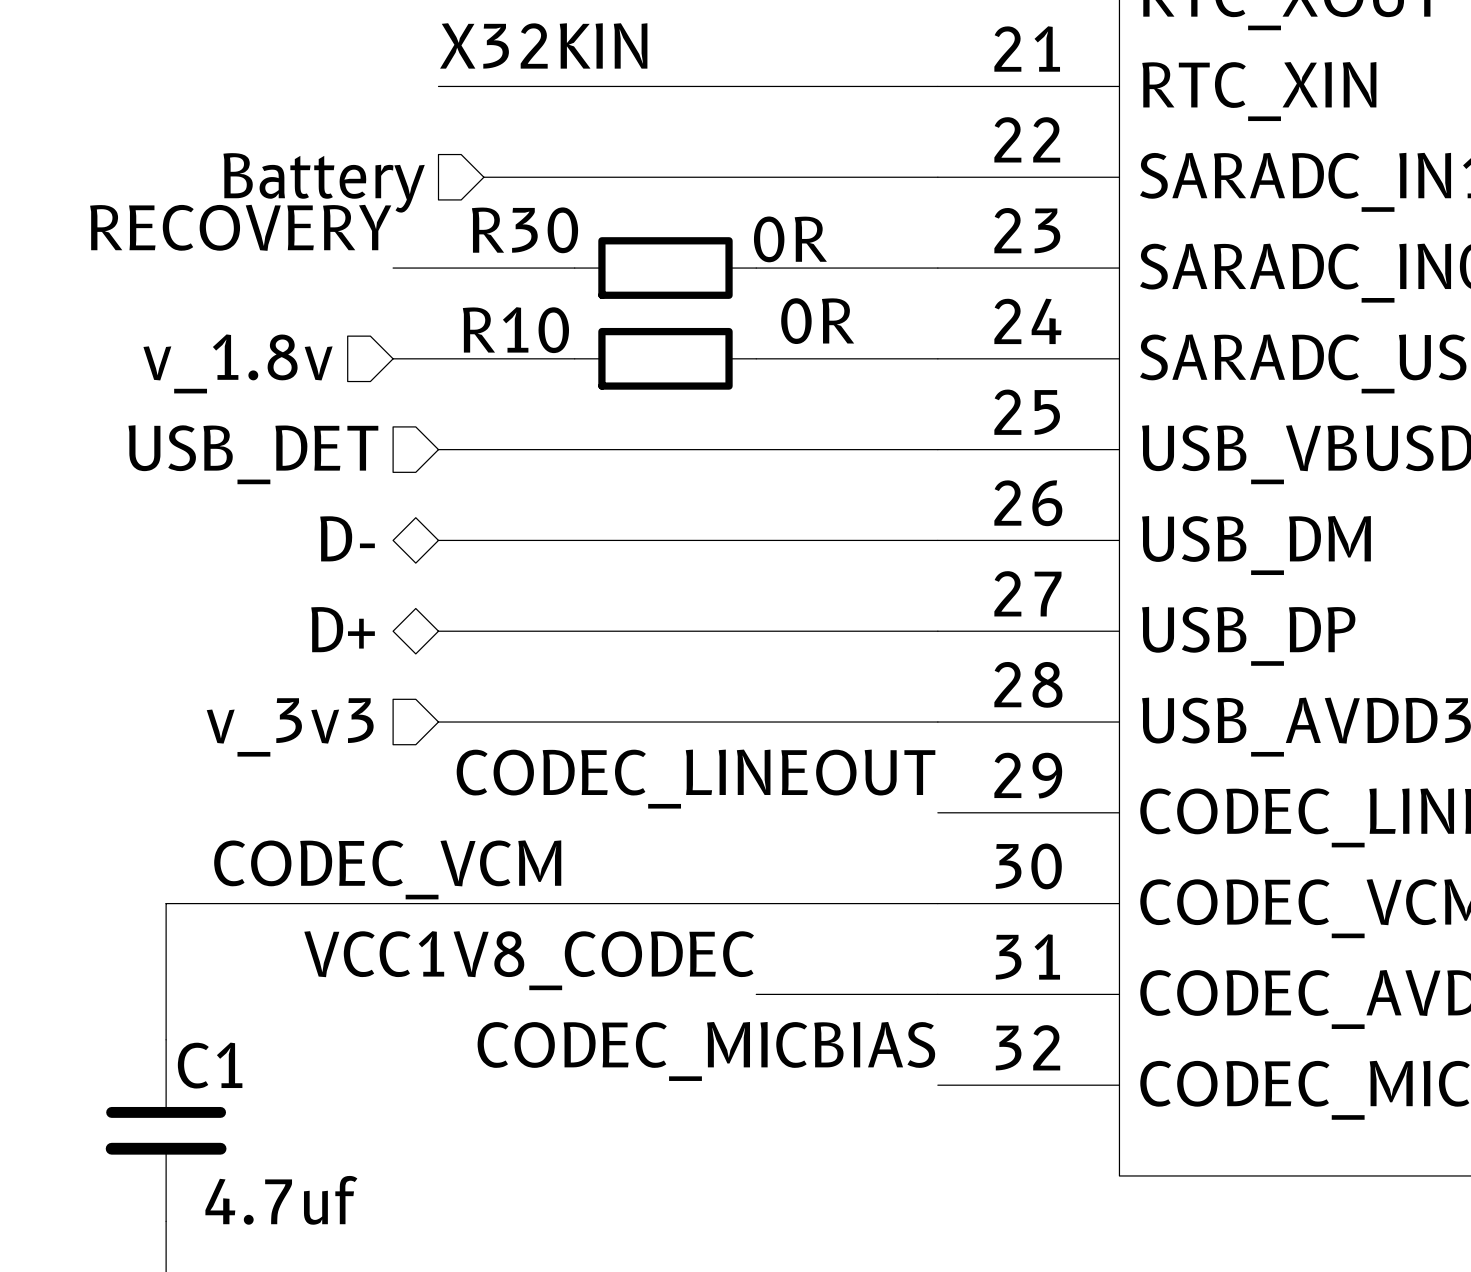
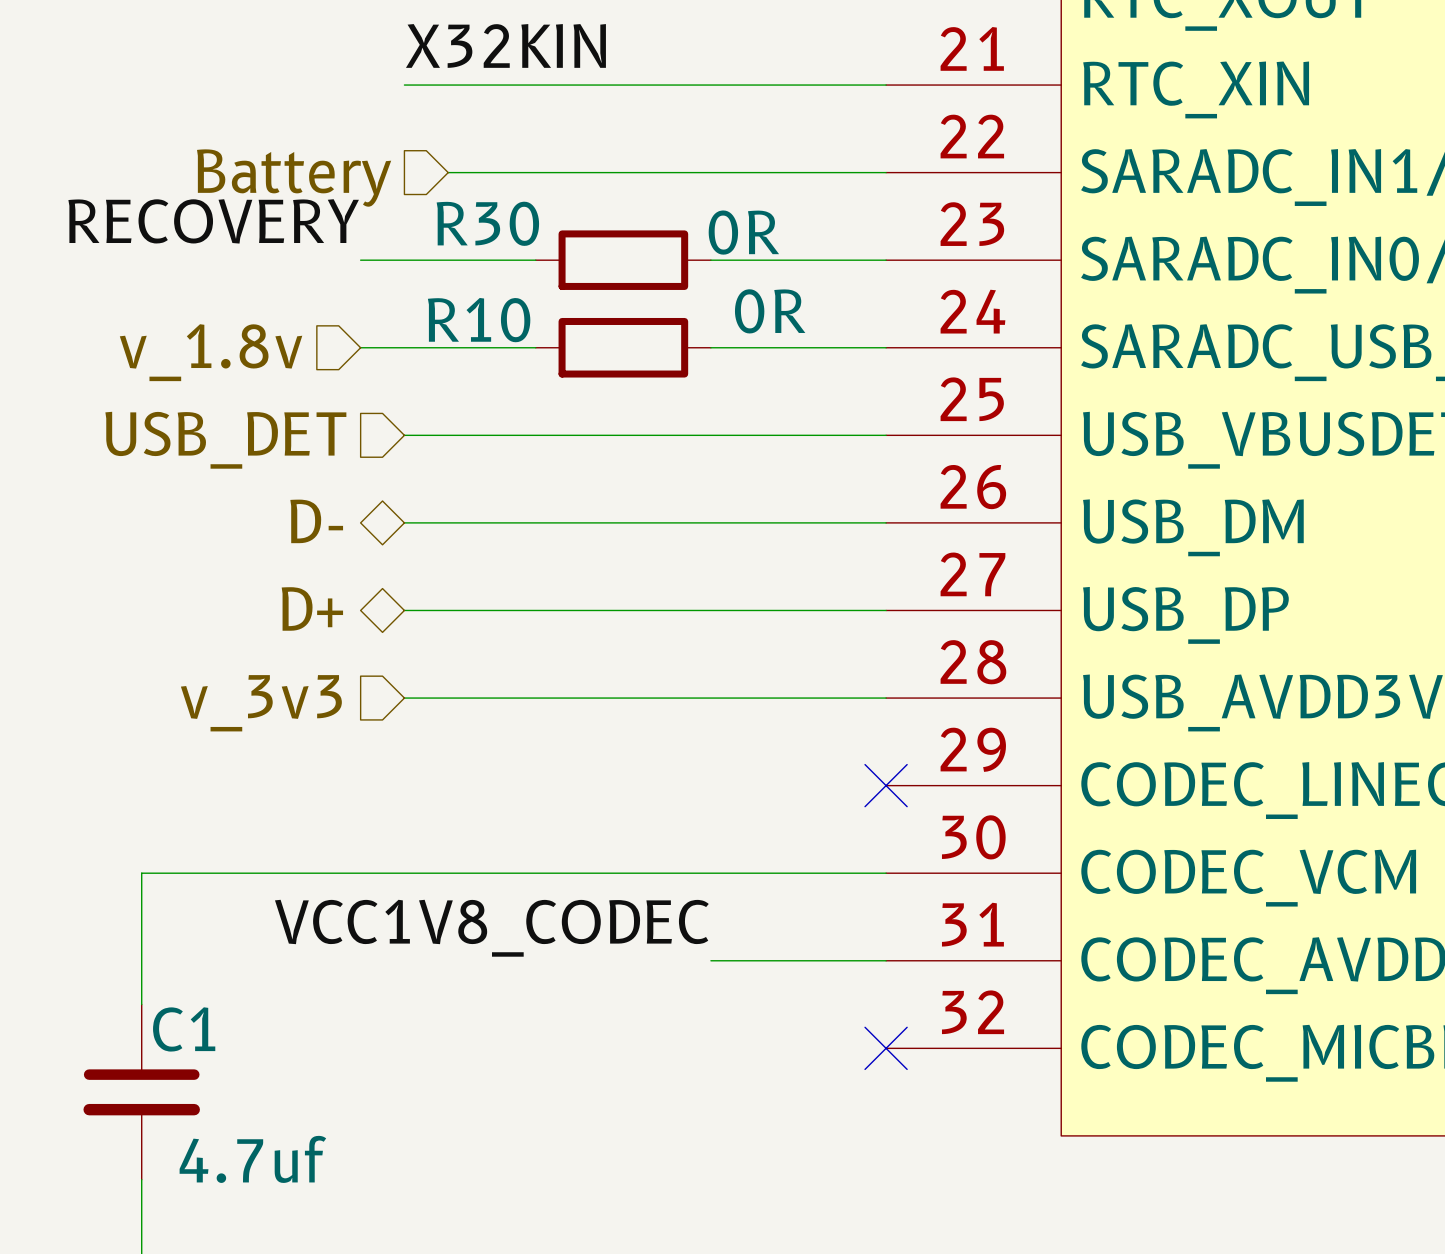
label: CODEC_LINEOUT (696, 779) -> none
no-connect mark: none -> (886, 785)
label: CODEC_VCM (387, 869) -> none
label: CODEC_MICBIAS (706, 1051) -> none
no-connect mark: none -> (886, 1048)

